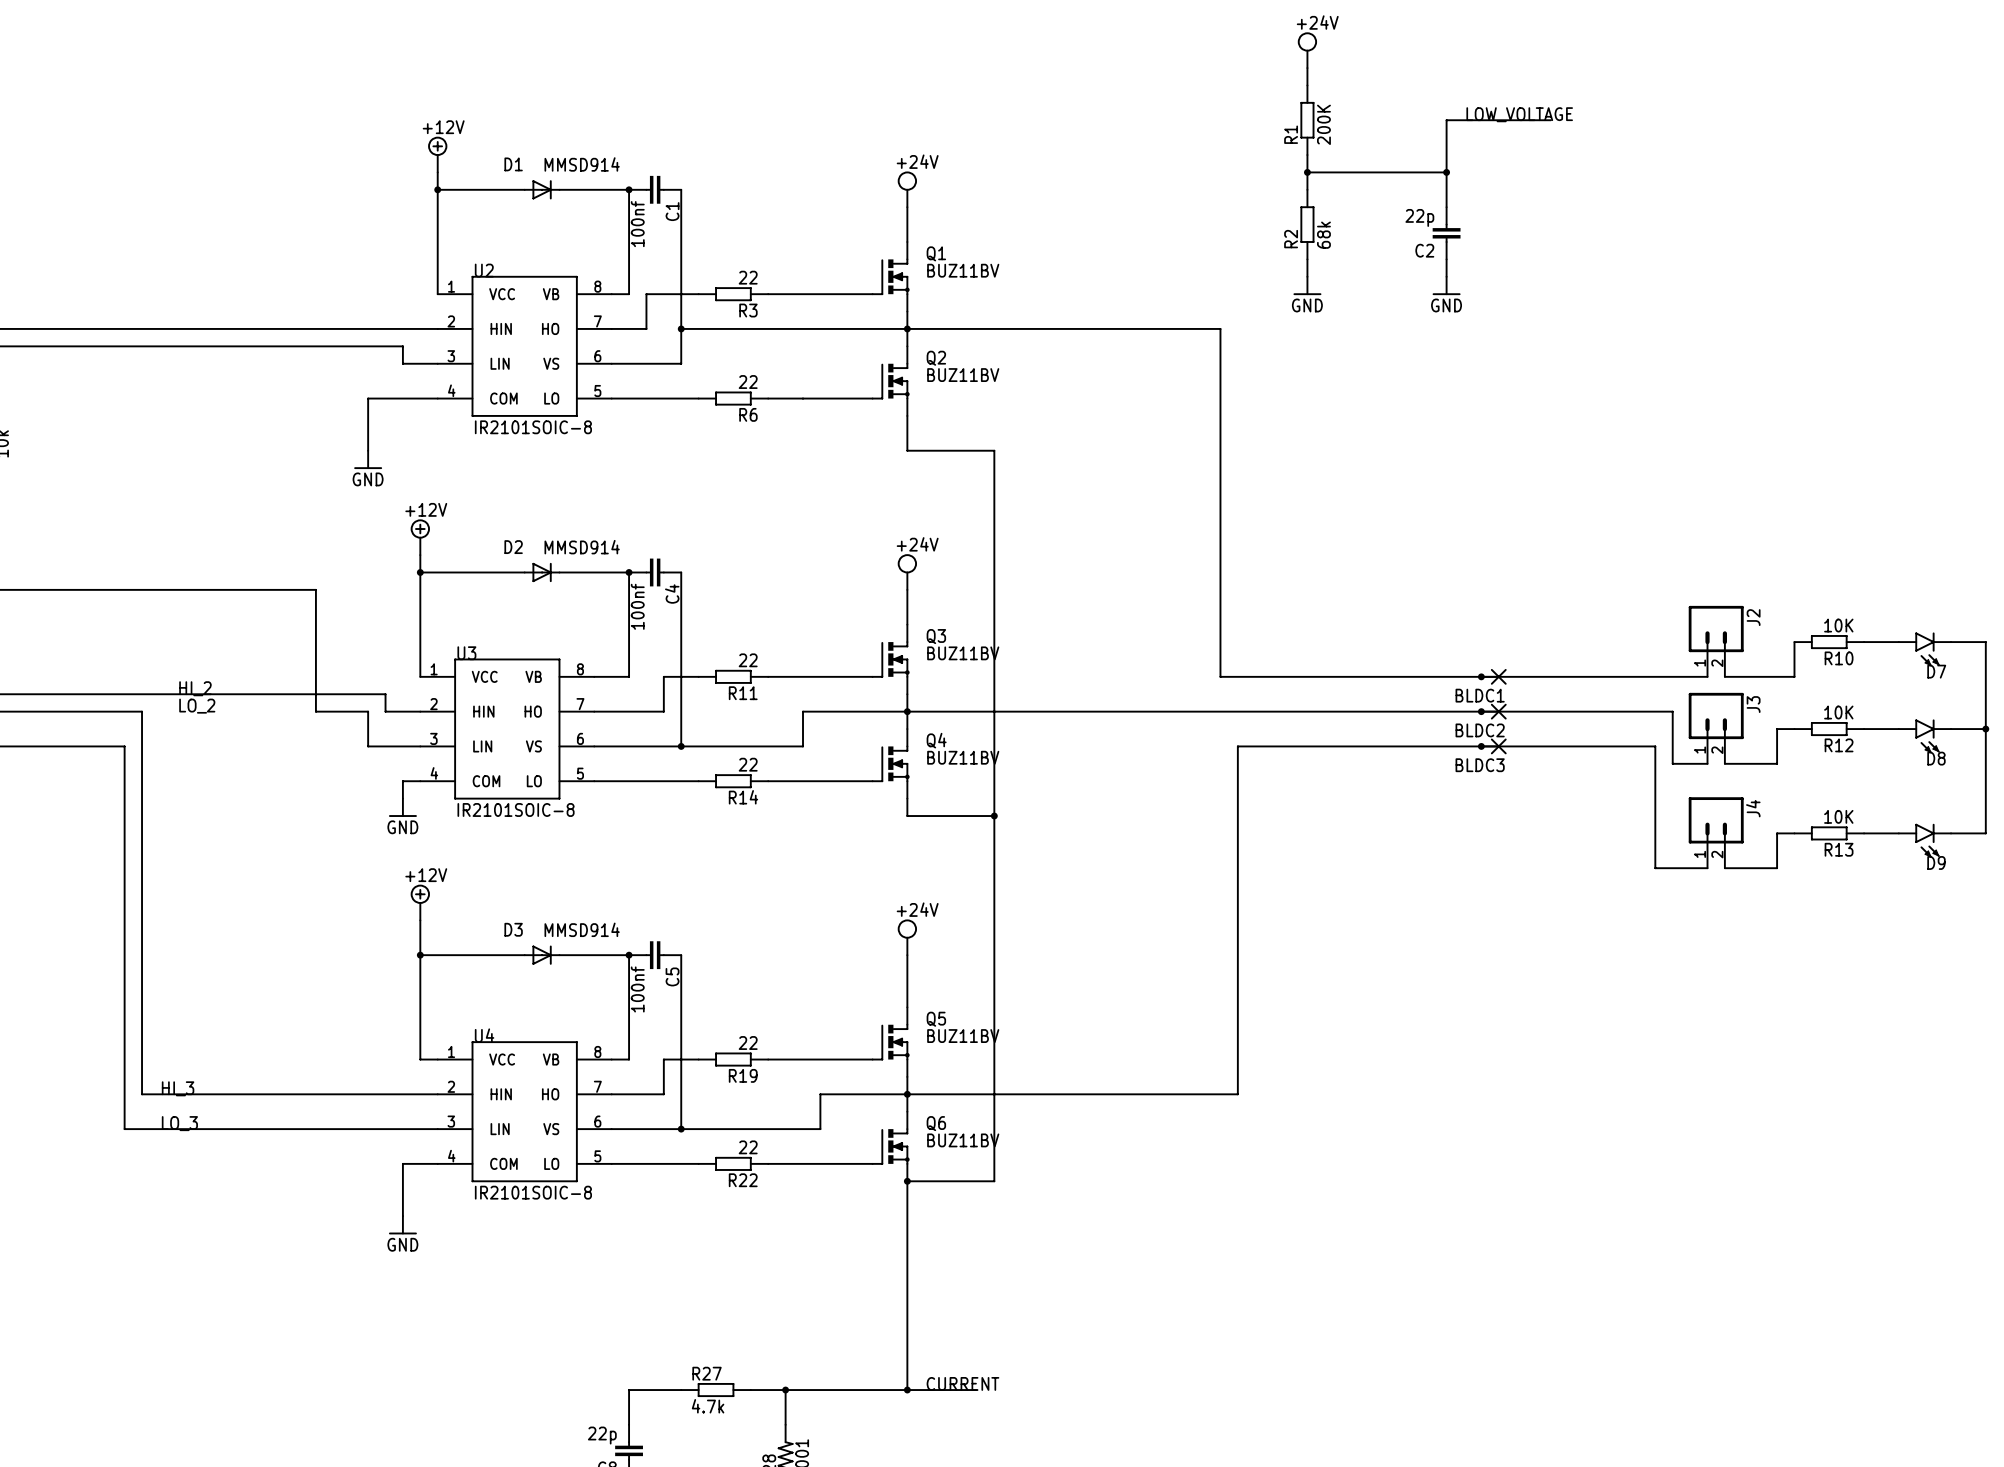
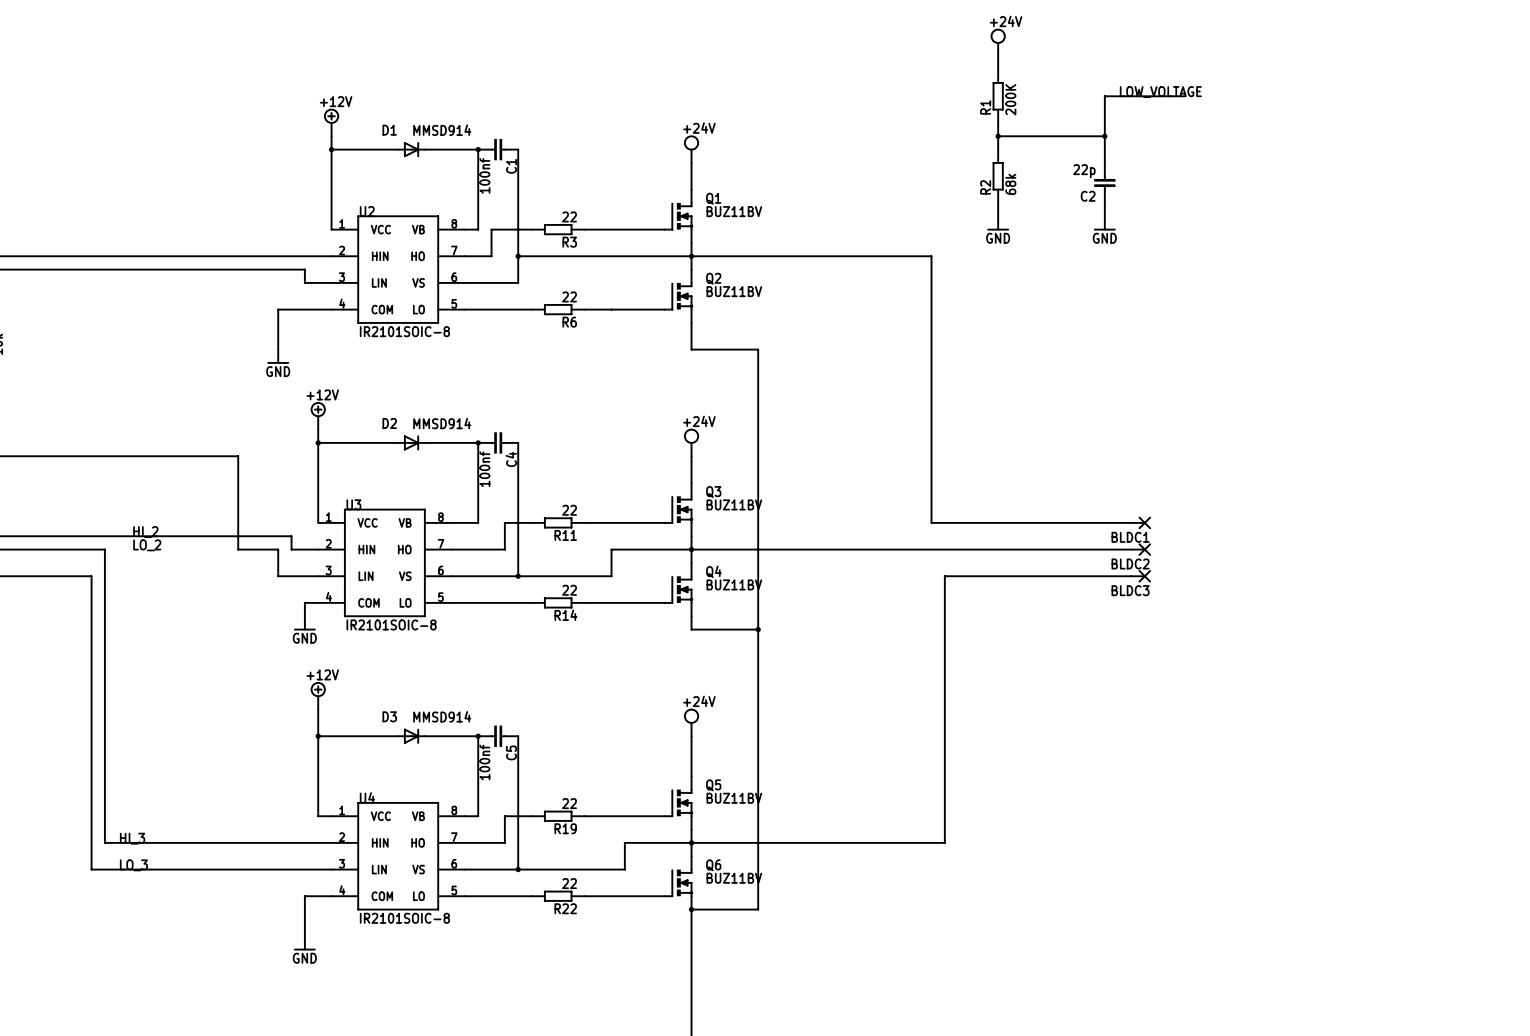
J2: (1716, 641) -> none
wire: (1794, 642) (1794, 676) (1724, 676) -> none
R10: 10K (1829, 642) -> none
wire: (1864, 642) (1898, 642) -> none
wire: (1951, 642) (1985, 642) (1985, 833) (1951, 833) -> none
D7: (1924, 649) -> none
wire: (1481, 676) (1707, 676) -> none
junction: (1481, 676) -> none
wire: (1481, 711) (1672, 711) (1672, 763) (1707, 763) -> none
junction: (1481, 711) -> none
J3: (1716, 728) -> none
wire: (1794, 729) (1777, 729) (1777, 763) (1724, 763) -> none
R12: 10K (1829, 729) -> none
wire: (1864, 729) (1898, 729) -> none
wire: (1951, 729) (1985, 729) -> none
junction: (1985, 729) -> none
D8: (1924, 736) -> none
wire: (1481, 746) (1655, 746) (1655, 868) (1707, 868) -> none
junction: (1481, 746) -> none
J4: (1716, 832) -> none
wire: (1794, 833) (1777, 833) (1777, 868) (1724, 868) -> none
R13: 10K (1829, 833) -> none
wire: (1864, 833) (1898, 833) -> none
D9: (1924, 840) -> none

